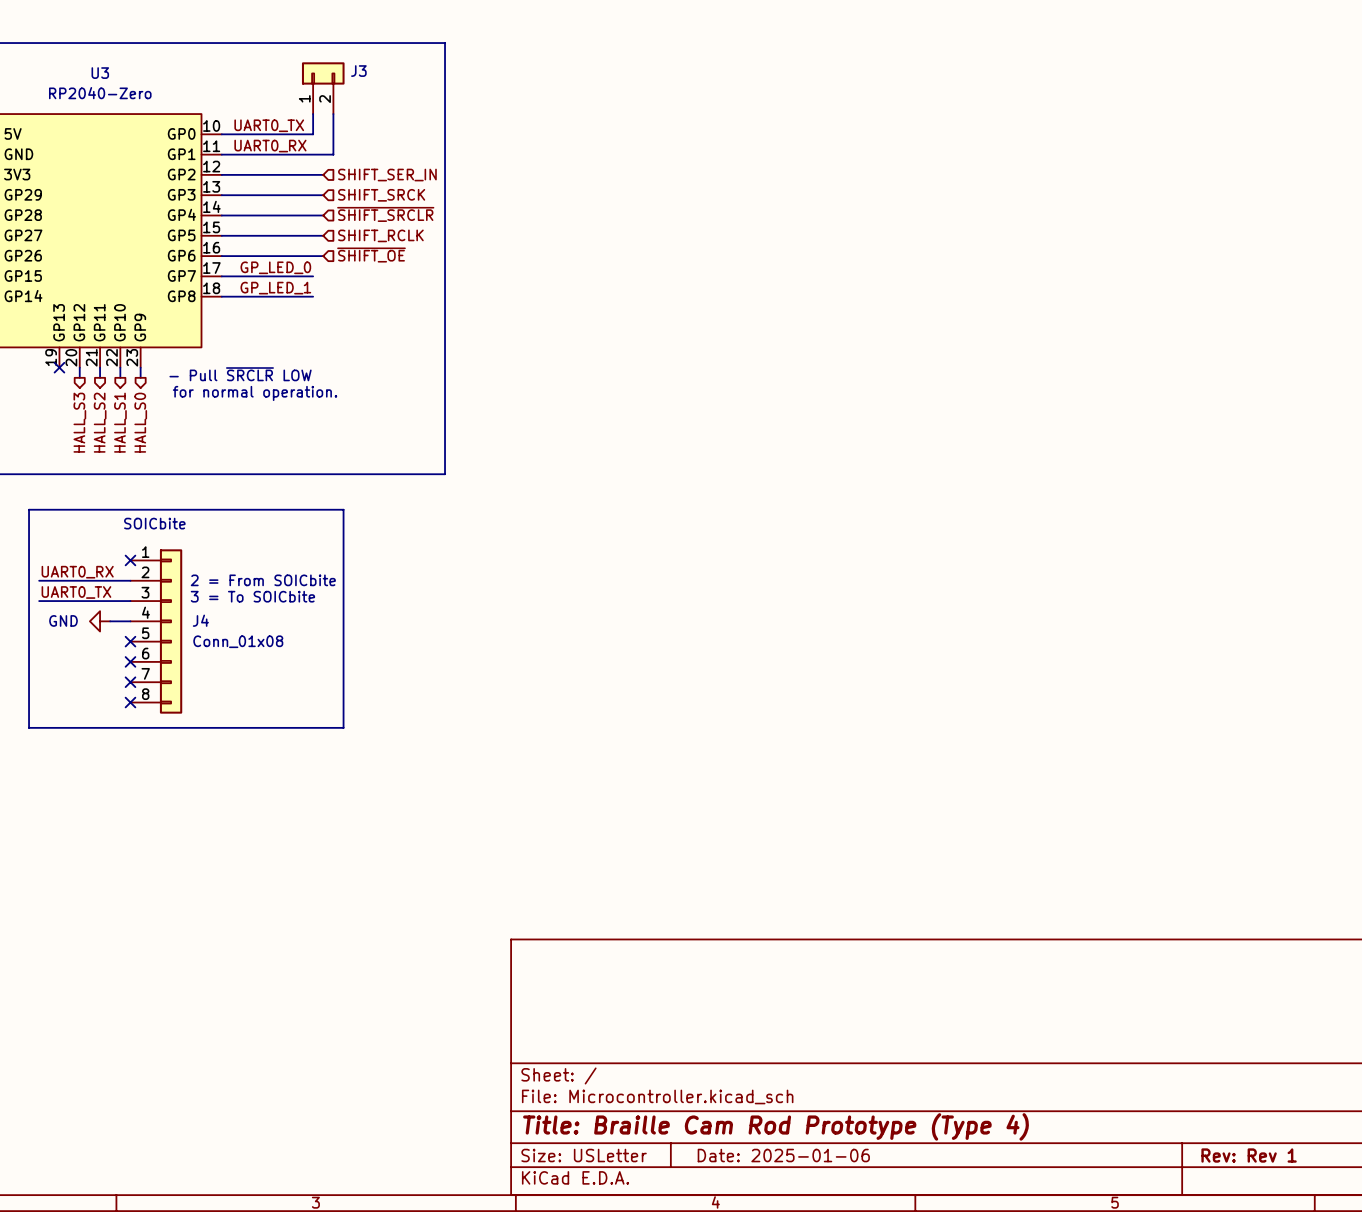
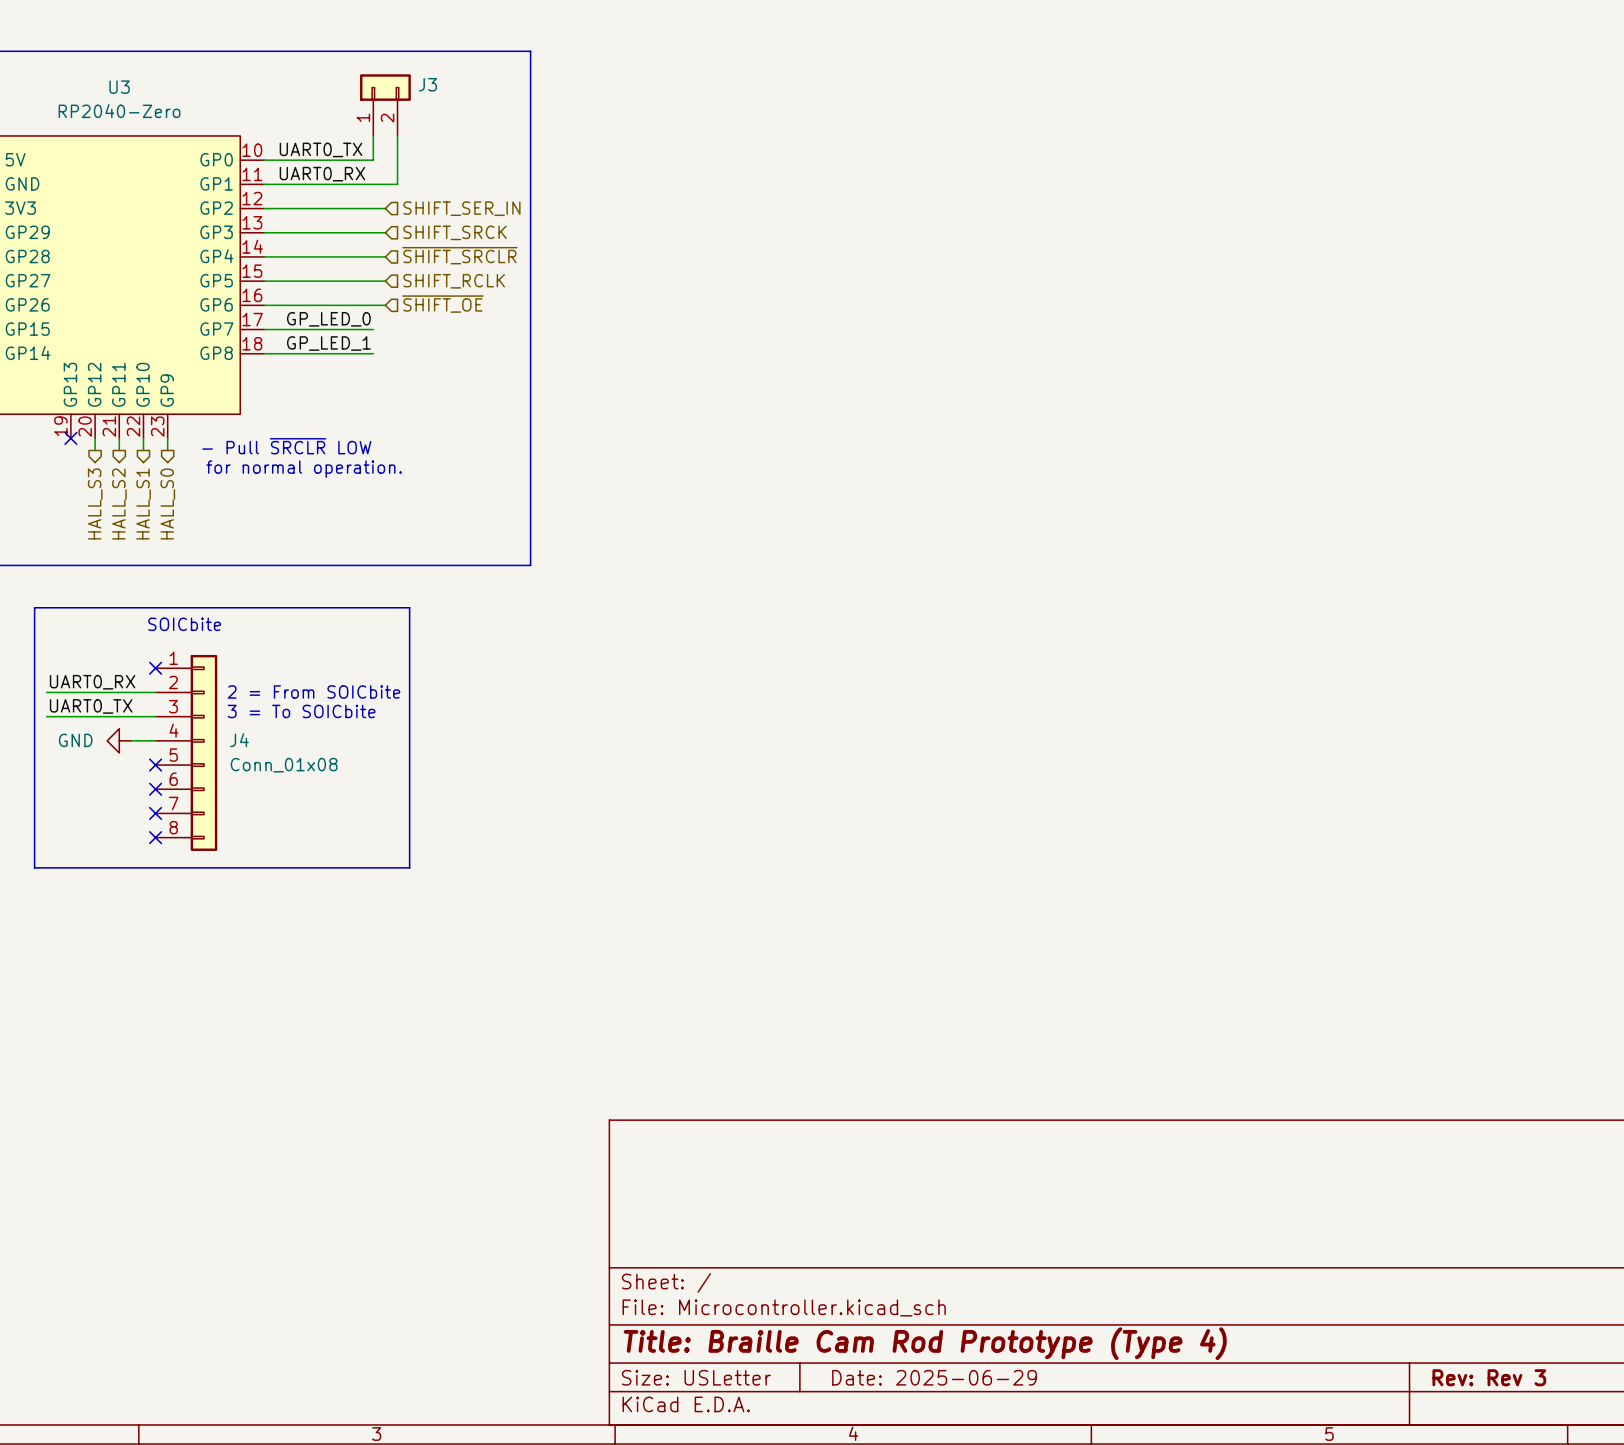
title block: Date: 2025-01-06 (783, 1155) -> Date: 2025-06-29 (934, 1377)
title block: Rev: Rev 1 (1249, 1155) -> Rev: Rev 3 (1489, 1377)

